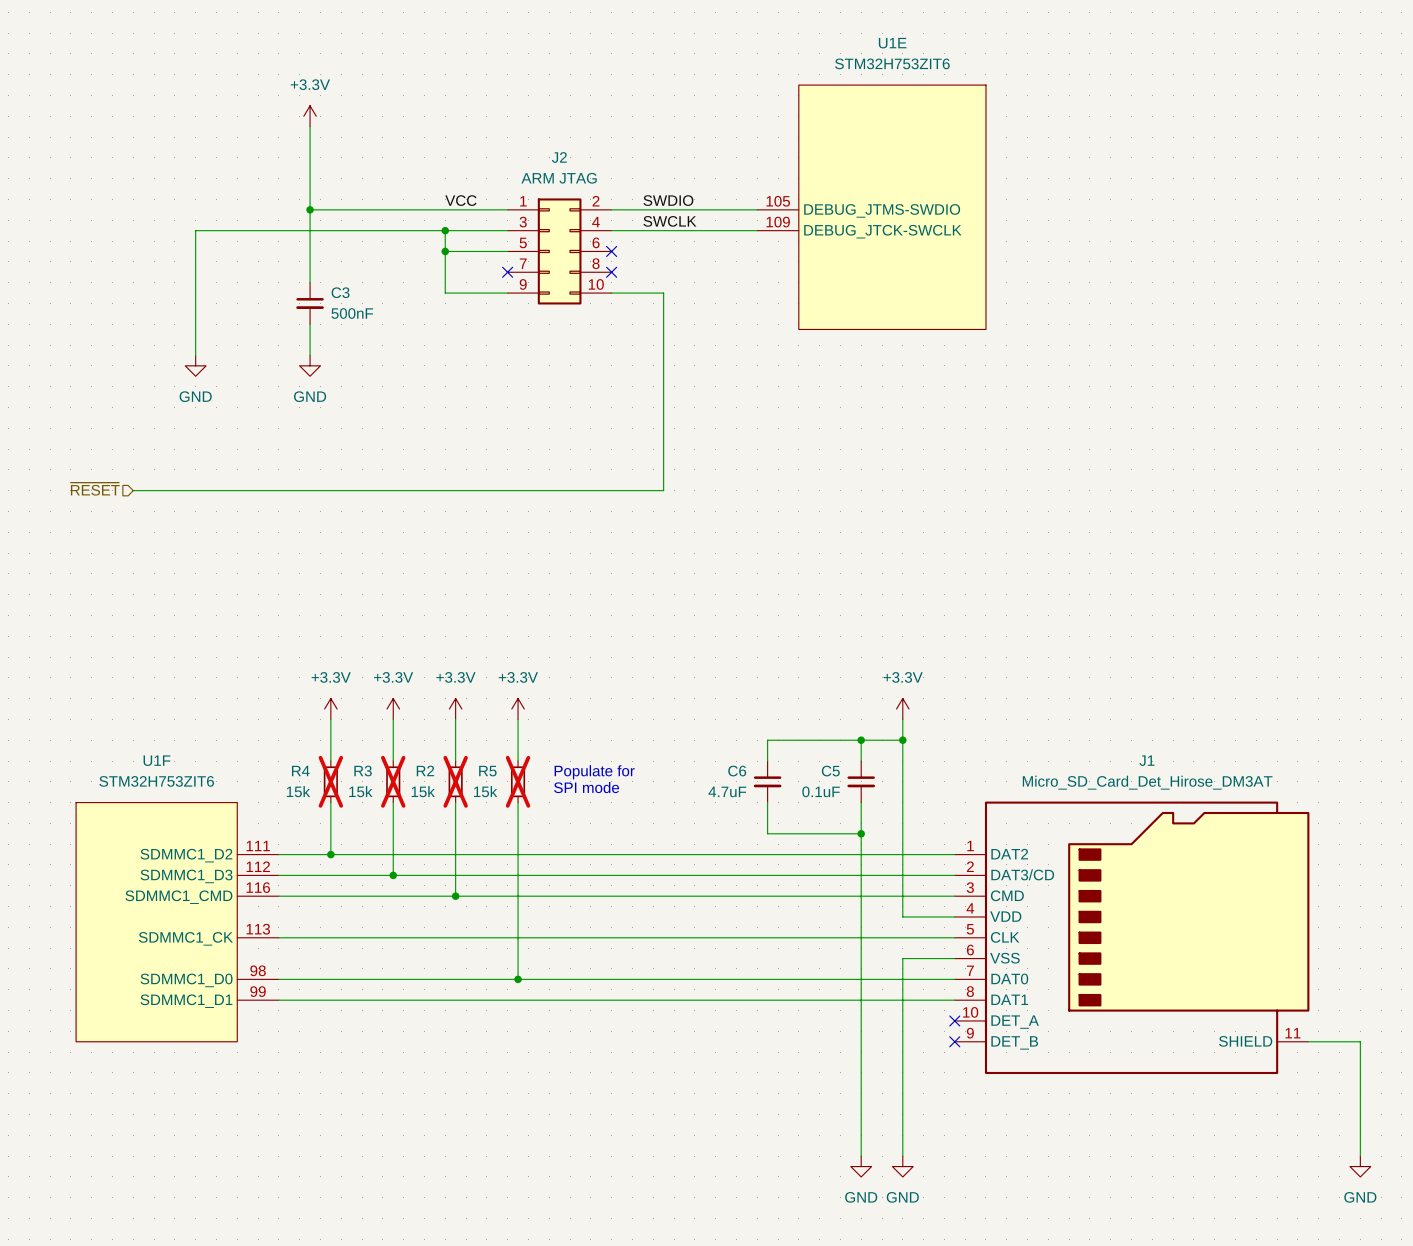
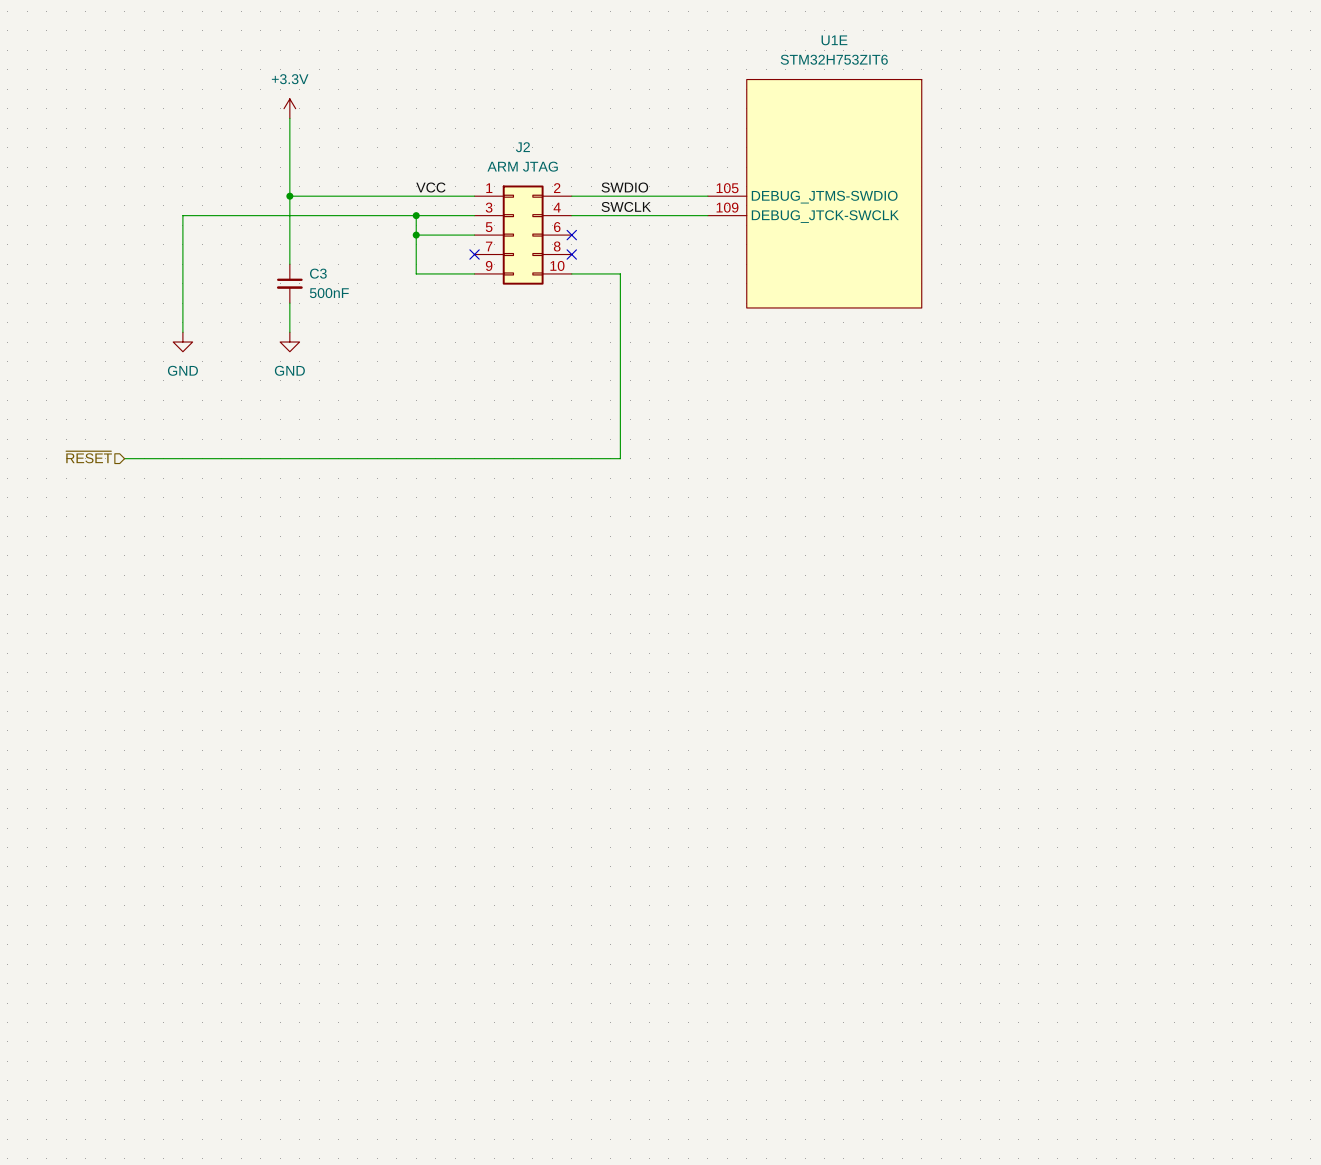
power symbol: +3.3V (330, 709) -> none
power symbol: +3.3V (393, 709) -> none
power symbol: +3.3V (455, 709) -> none
power symbol: +3.3V (518, 709) -> none
power symbol: +3.3V (902, 709) -> none
wire: (330, 719) (330, 761) -> none
wire: (393, 719) (393, 761) -> none
wire: (455, 719) (455, 761) -> none
wire: (518, 719) (518, 761) -> none
wire: (902, 719) (902, 916) (954, 916) -> none
wire: (861, 740) (861, 761) -> none
junction: (861, 740) -> none
wire: (902, 740) (767, 740) (767, 761) -> none
junction: (902, 740) -> none
text: Populate for (594, 772) -> none
R4: 15k (330, 781) -> none
R3: 15k (393, 781) -> none
R2: 15k (455, 781) -> none
R5: 15k (518, 781) -> none
C6: 4.7uF (767, 781) -> none
C5: 0.1uF (861, 781) -> none
text: SPI mode (586, 787) -> none
wire: (330, 802) (330, 854) -> none
wire: (393, 802) (393, 875) -> none
wire: (455, 802) (455, 896) -> none
wire: (518, 802) (518, 979) -> none
wire: (767, 802) (767, 833) (861, 833) -> none
wire: (861, 802) (861, 1156) -> none
junction: (861, 833) -> none
wire: (278, 854) (954, 854) -> none
junction: (330, 854) -> none
wire: (278, 875) (954, 875) -> none
junction: (393, 875) -> none
wire: (278, 896) (954, 896) -> none
junction: (455, 896) -> none
U1F: STM32H753ZIT6 (177, 922) -> none
wire: (278, 937) (954, 937) -> none
J1: Micro_SD_Card_Det_Hirose_DM3AT (1132, 937) -> none
wire: (954, 958) (902, 958) (902, 1156) -> none
wire: (278, 979) (954, 979) -> none
junction: (518, 979) -> none
wire: (278, 1000) (954, 1000) -> none
no-connect mark: (954, 1020) -> none
no-connect mark: (954, 1041) -> none
wire: (1308, 1041) (1360, 1041) (1360, 1156) -> none
power symbol: GND (861, 1166) -> none
power symbol: GND (902, 1166) -> none
power symbol: GND (1360, 1166) -> none

